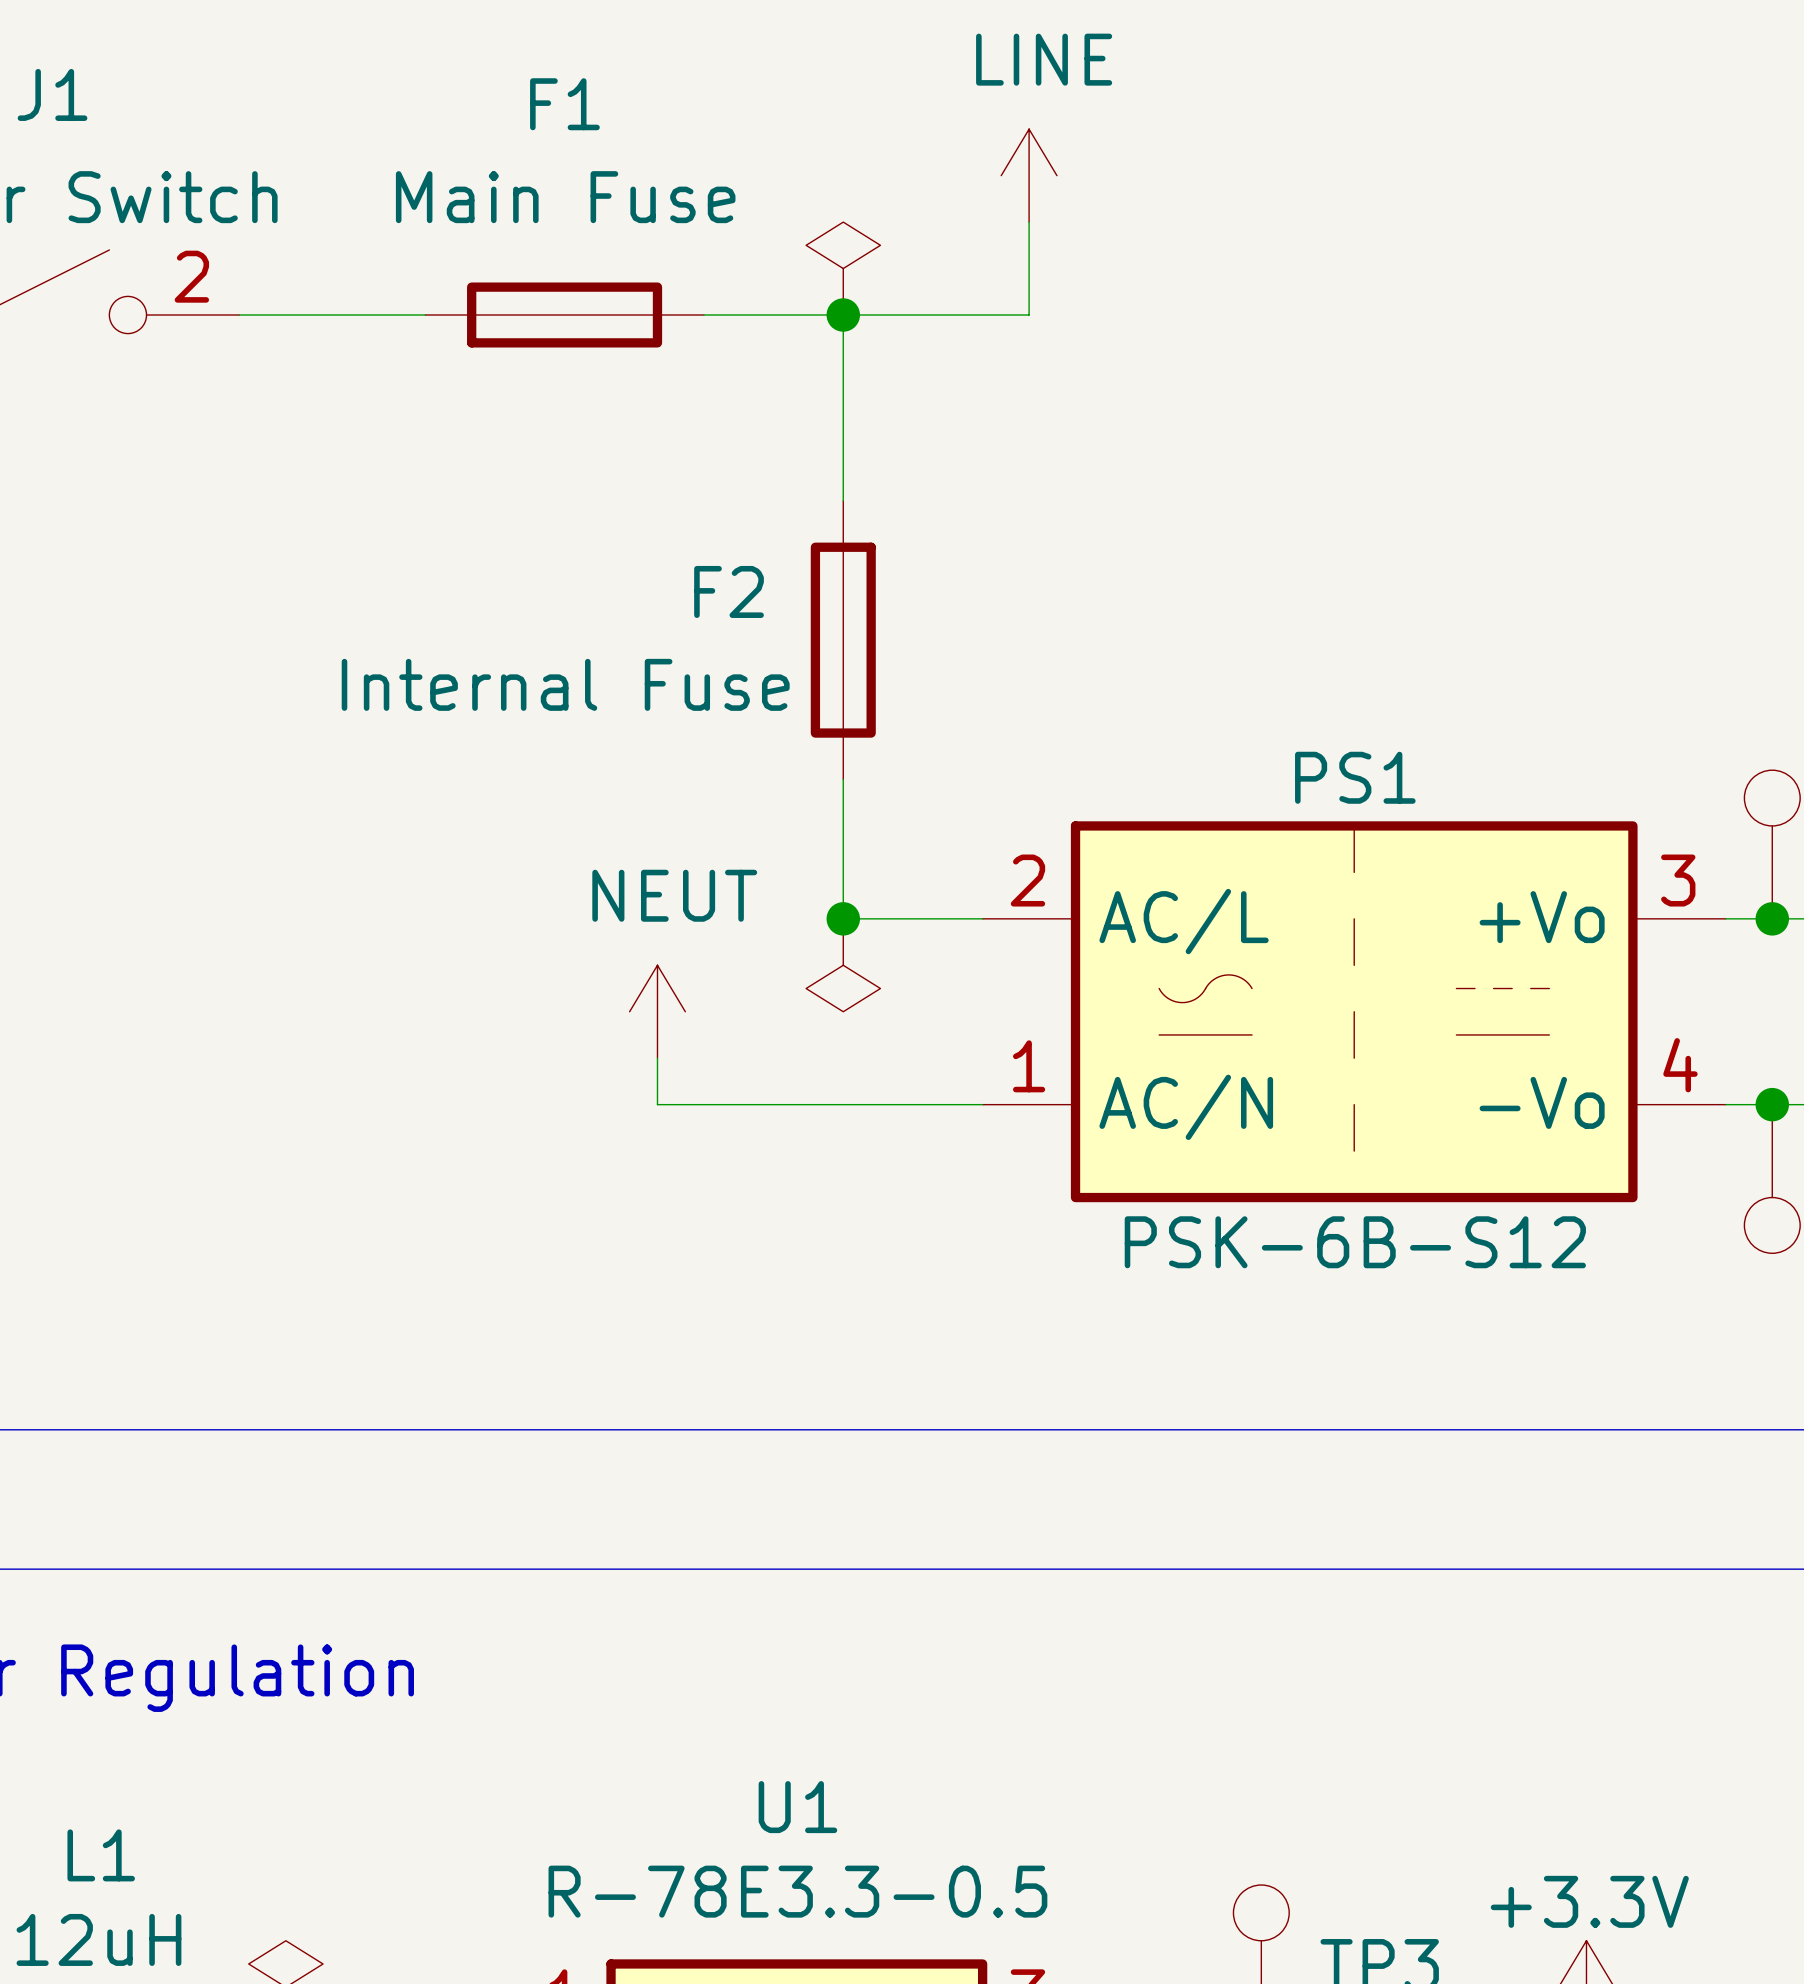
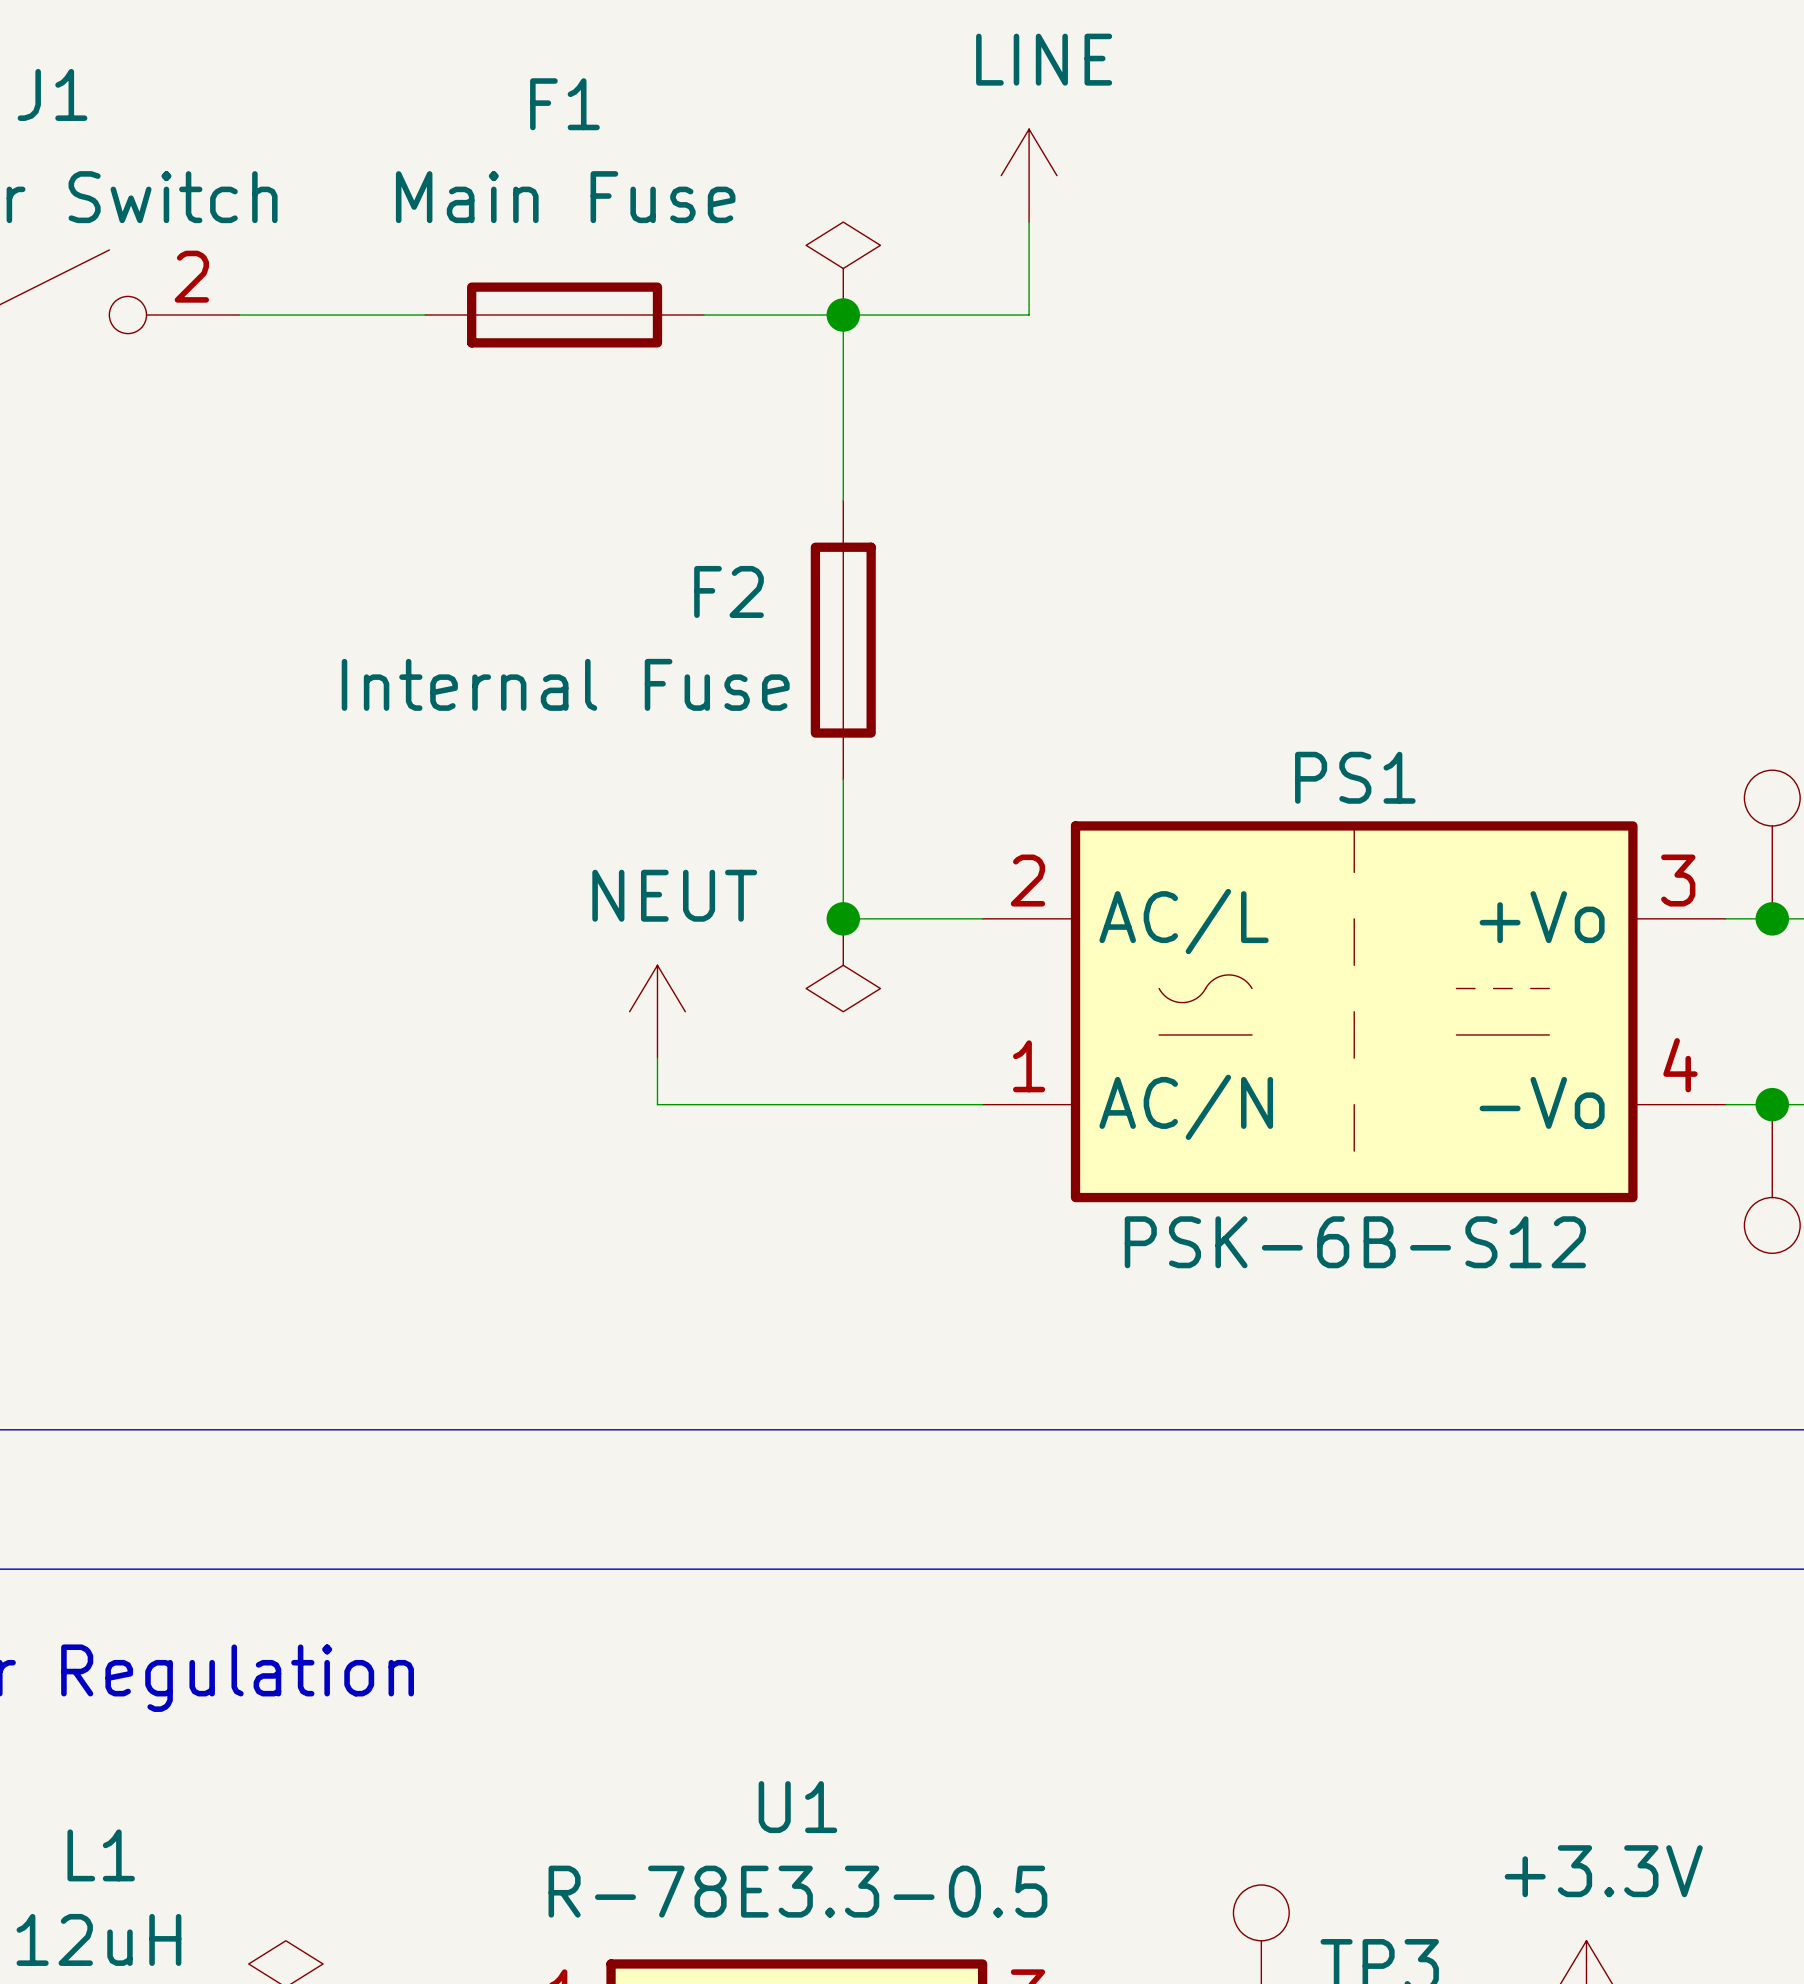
power symbol text position: +3.3V (1589, 1901) -> +3.3V (1603, 1871)

